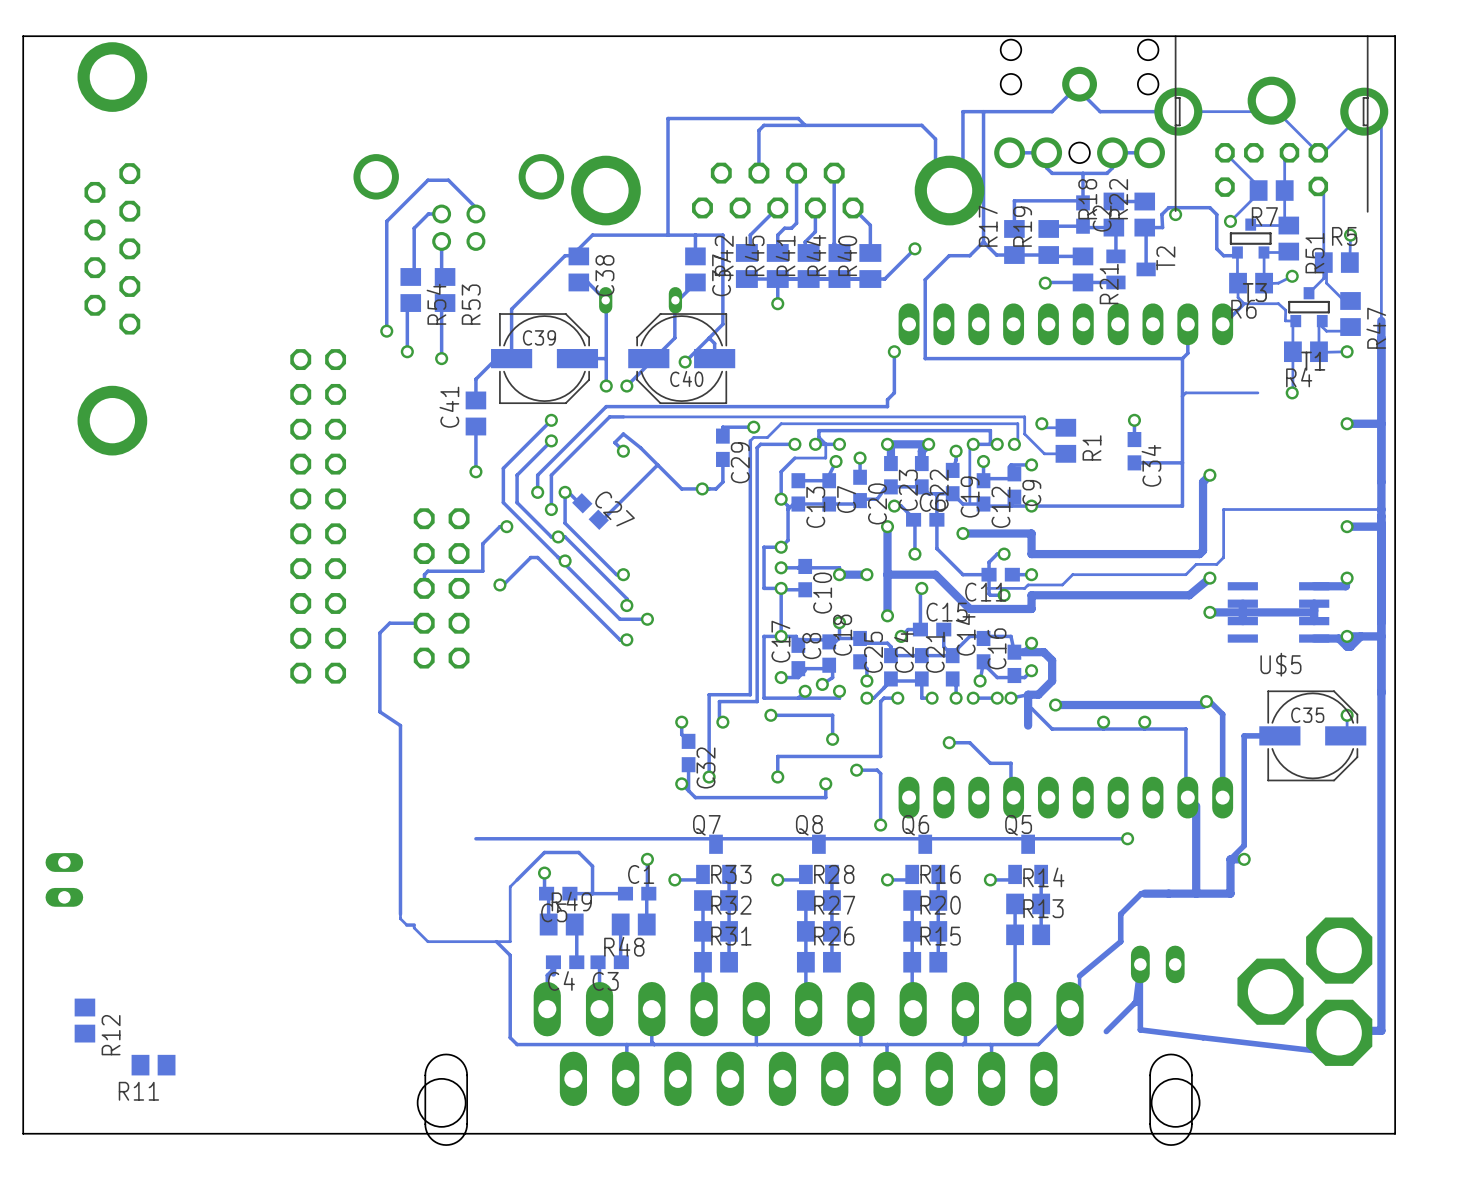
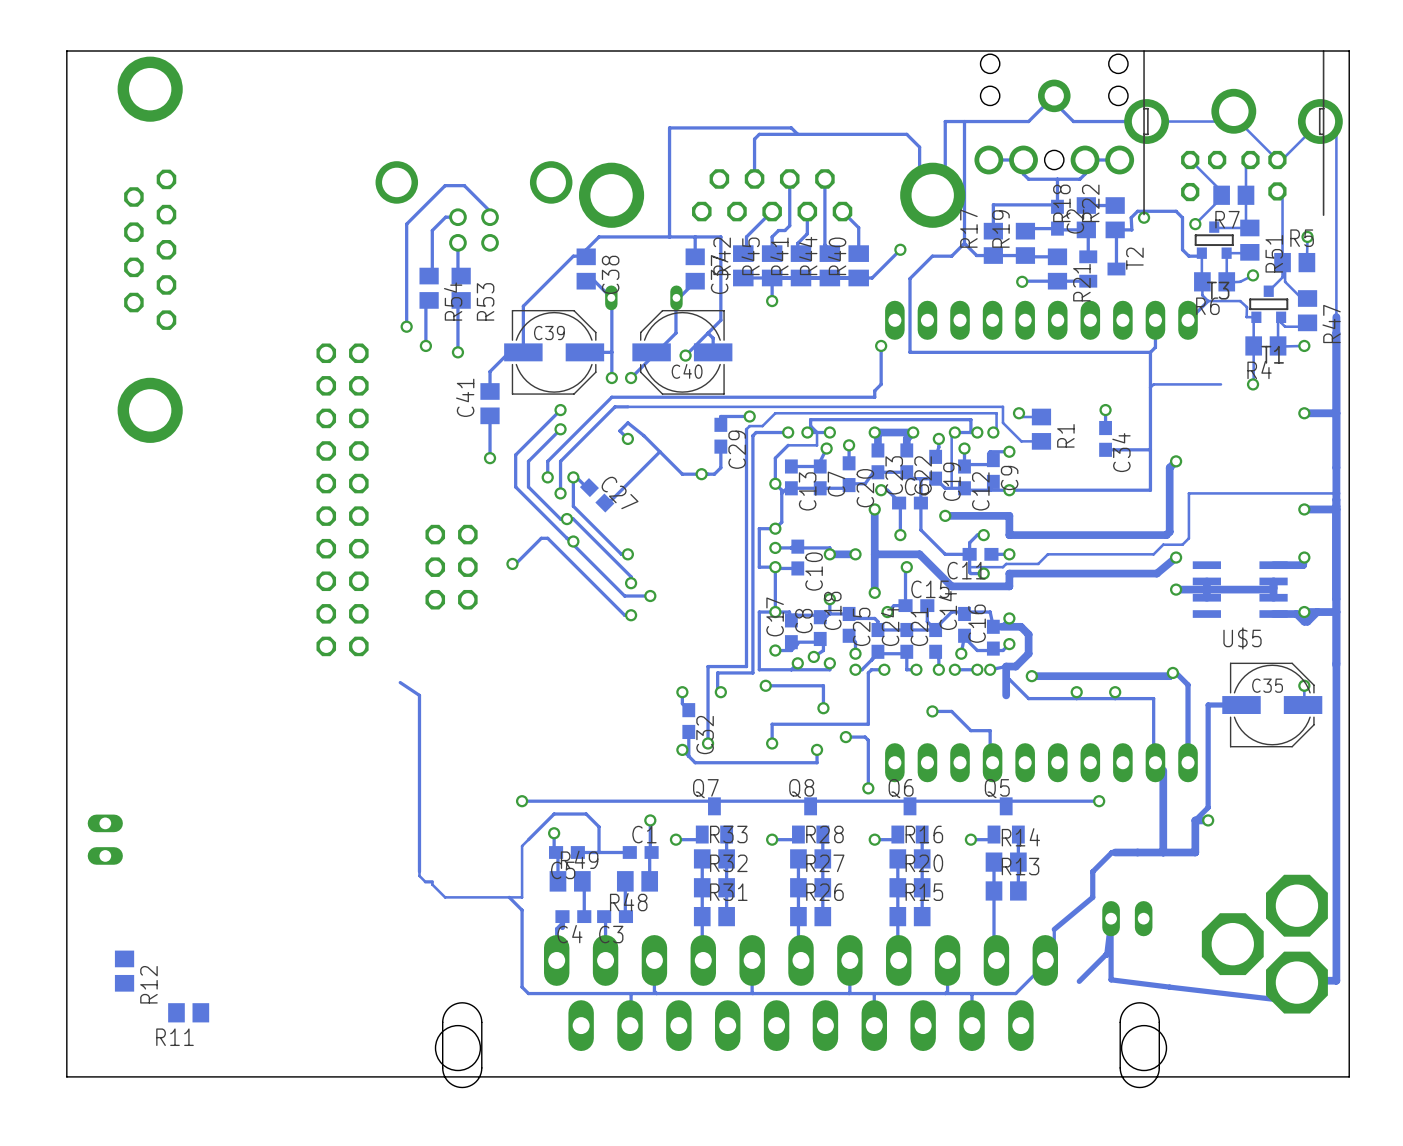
part footprint: [413, 508, 470, 669] -> [425, 524, 478, 610]
track: (506, 526) (499, 526) (482, 543) (482, 571) (427, 571) (424, 574) (424, 588) -> none
via: (506, 526) -> none
track: (424, 623) (389, 623) (379, 632) (379, 711) -> none
track: (510, 838) (475, 838) -> none
via: none -> (522, 801)

